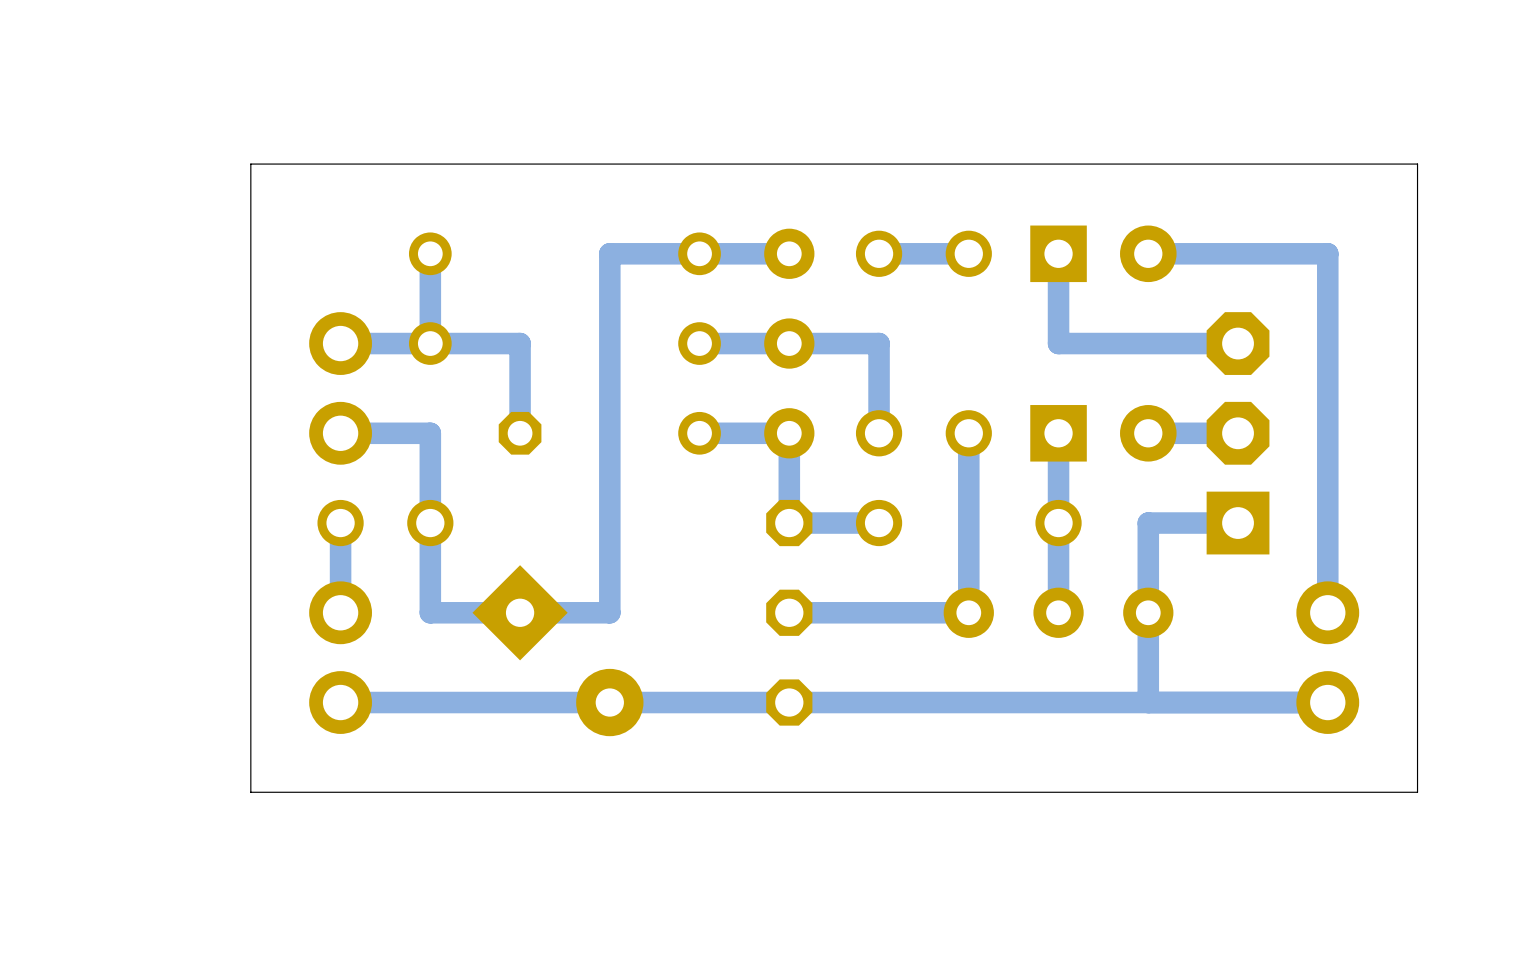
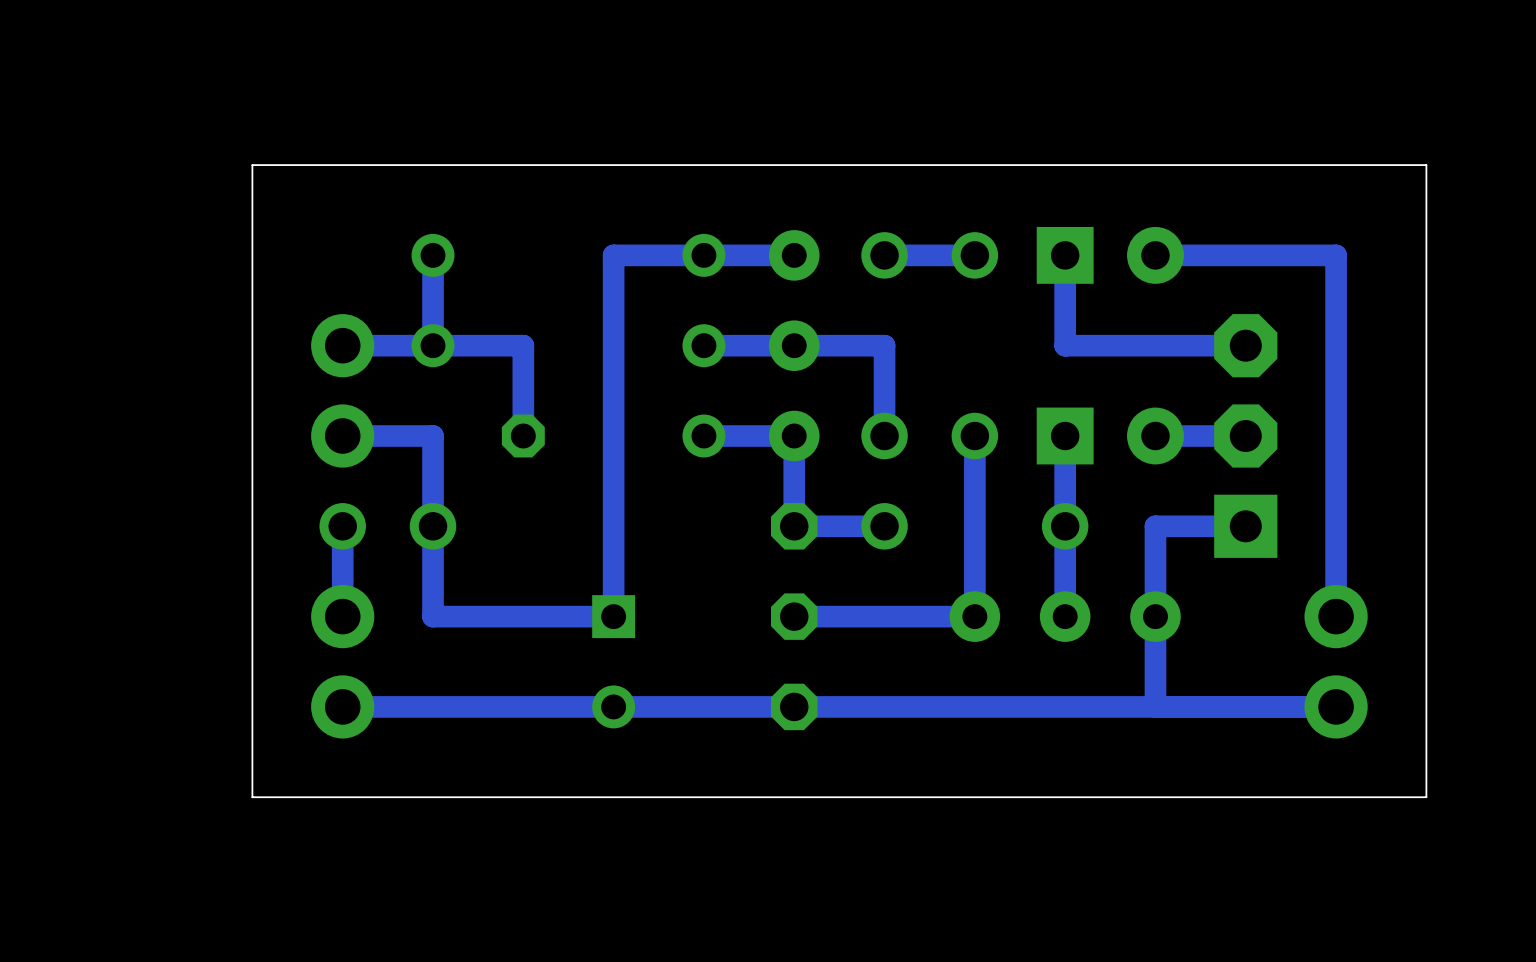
part: (557, 650) -> none
part: none -> (613, 661)

